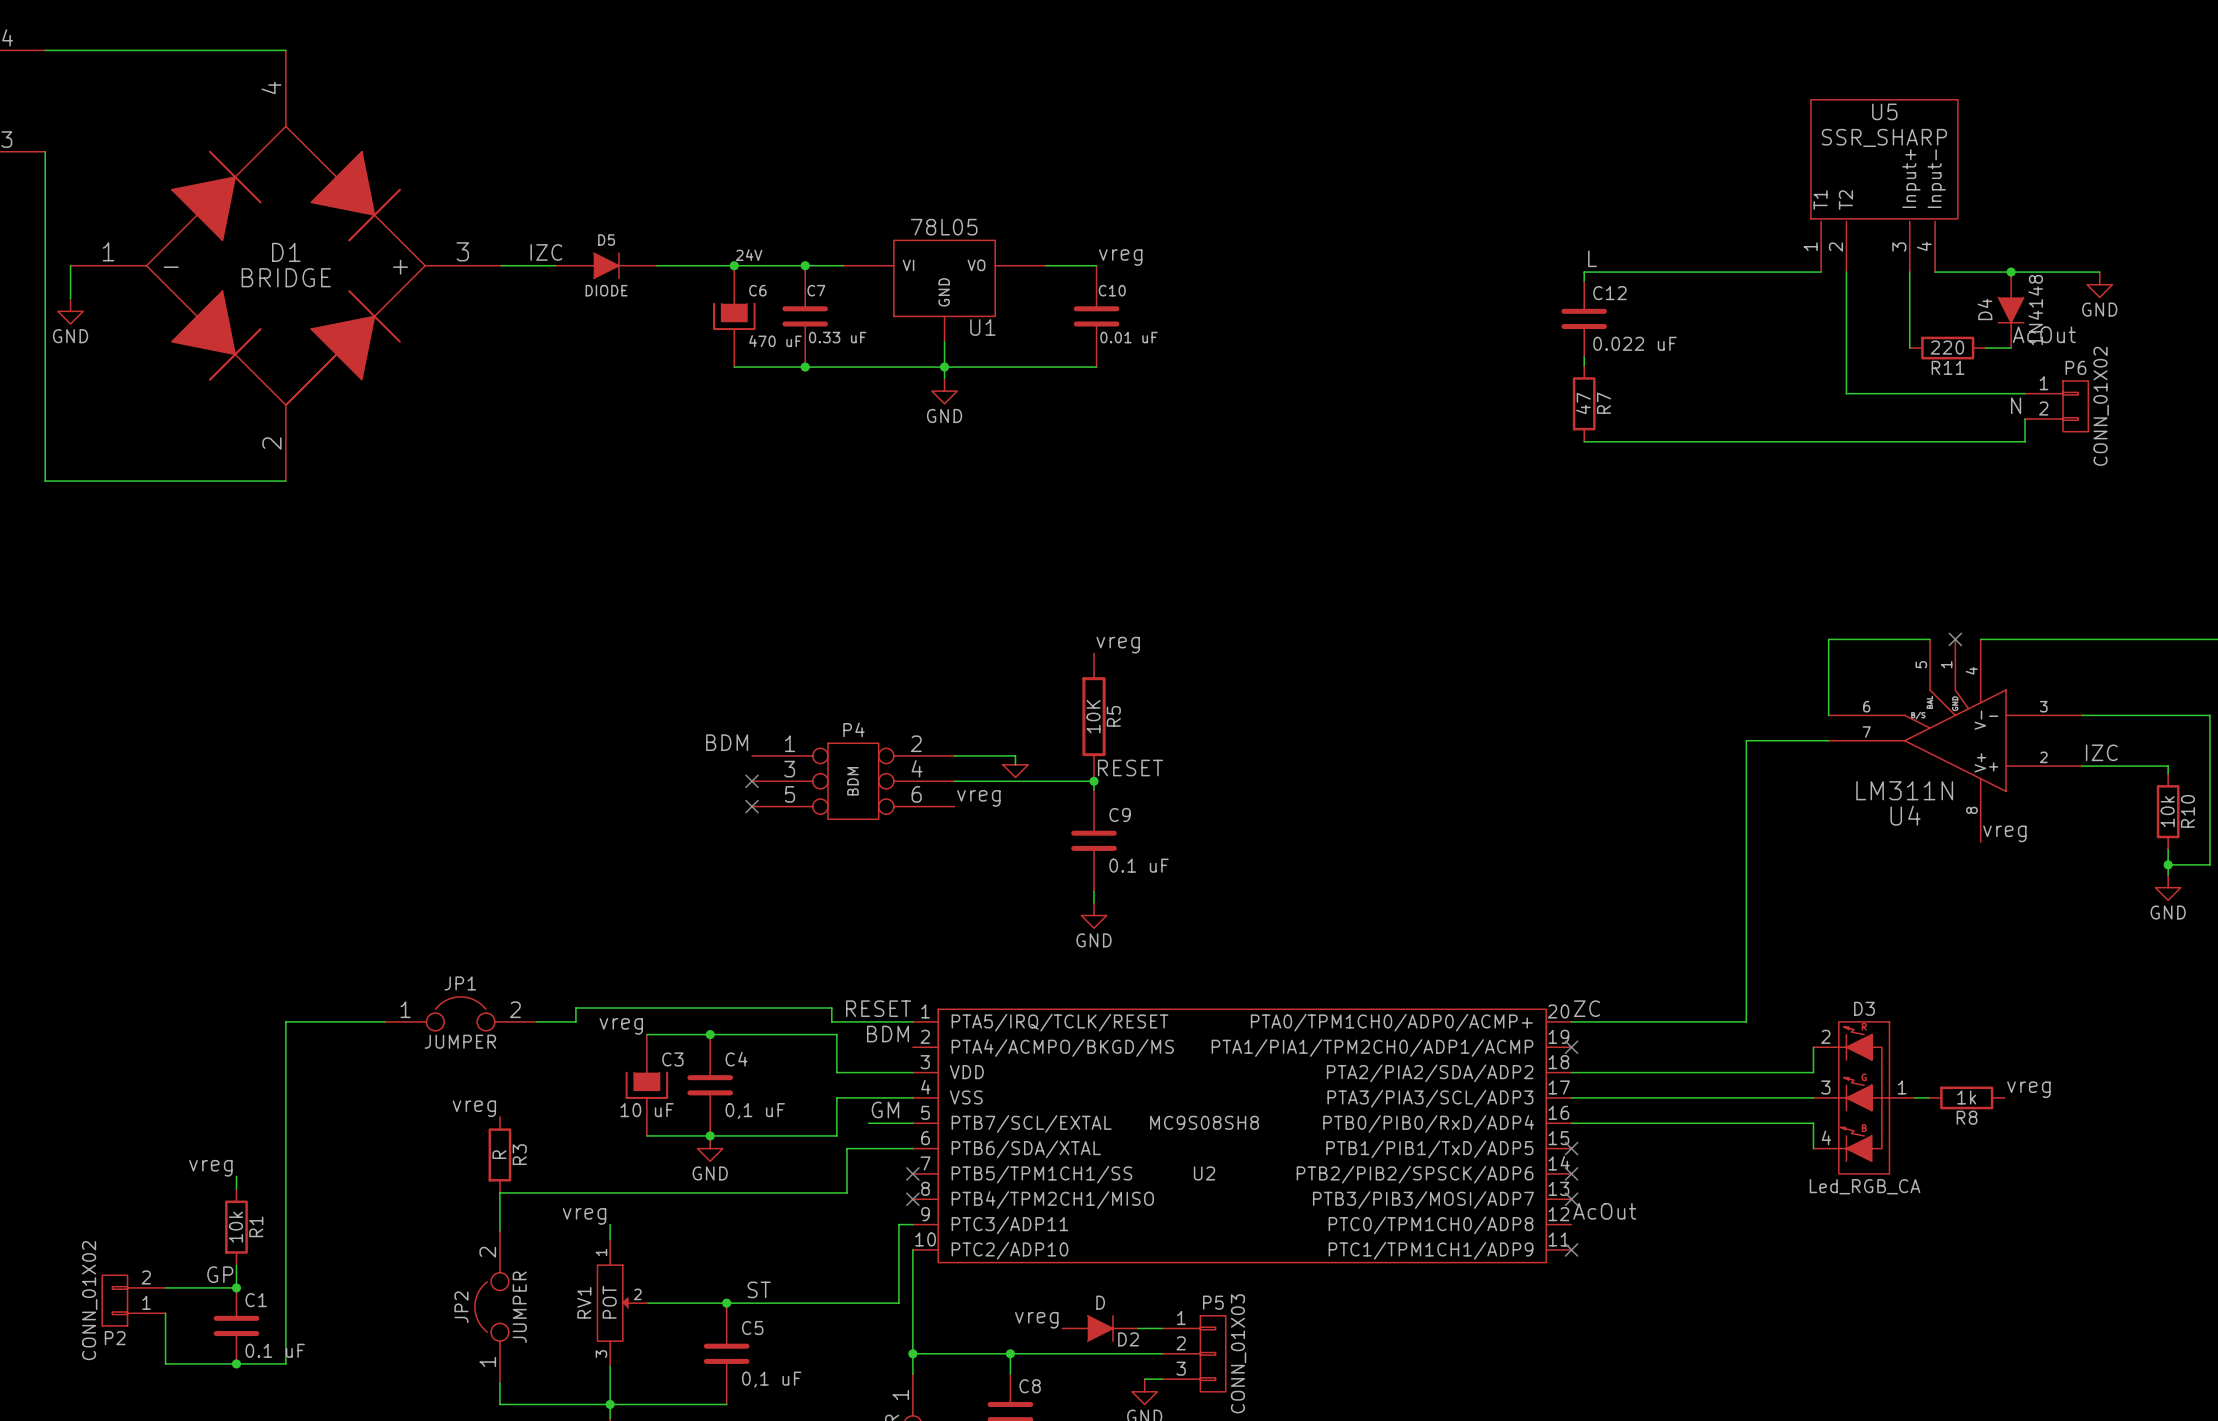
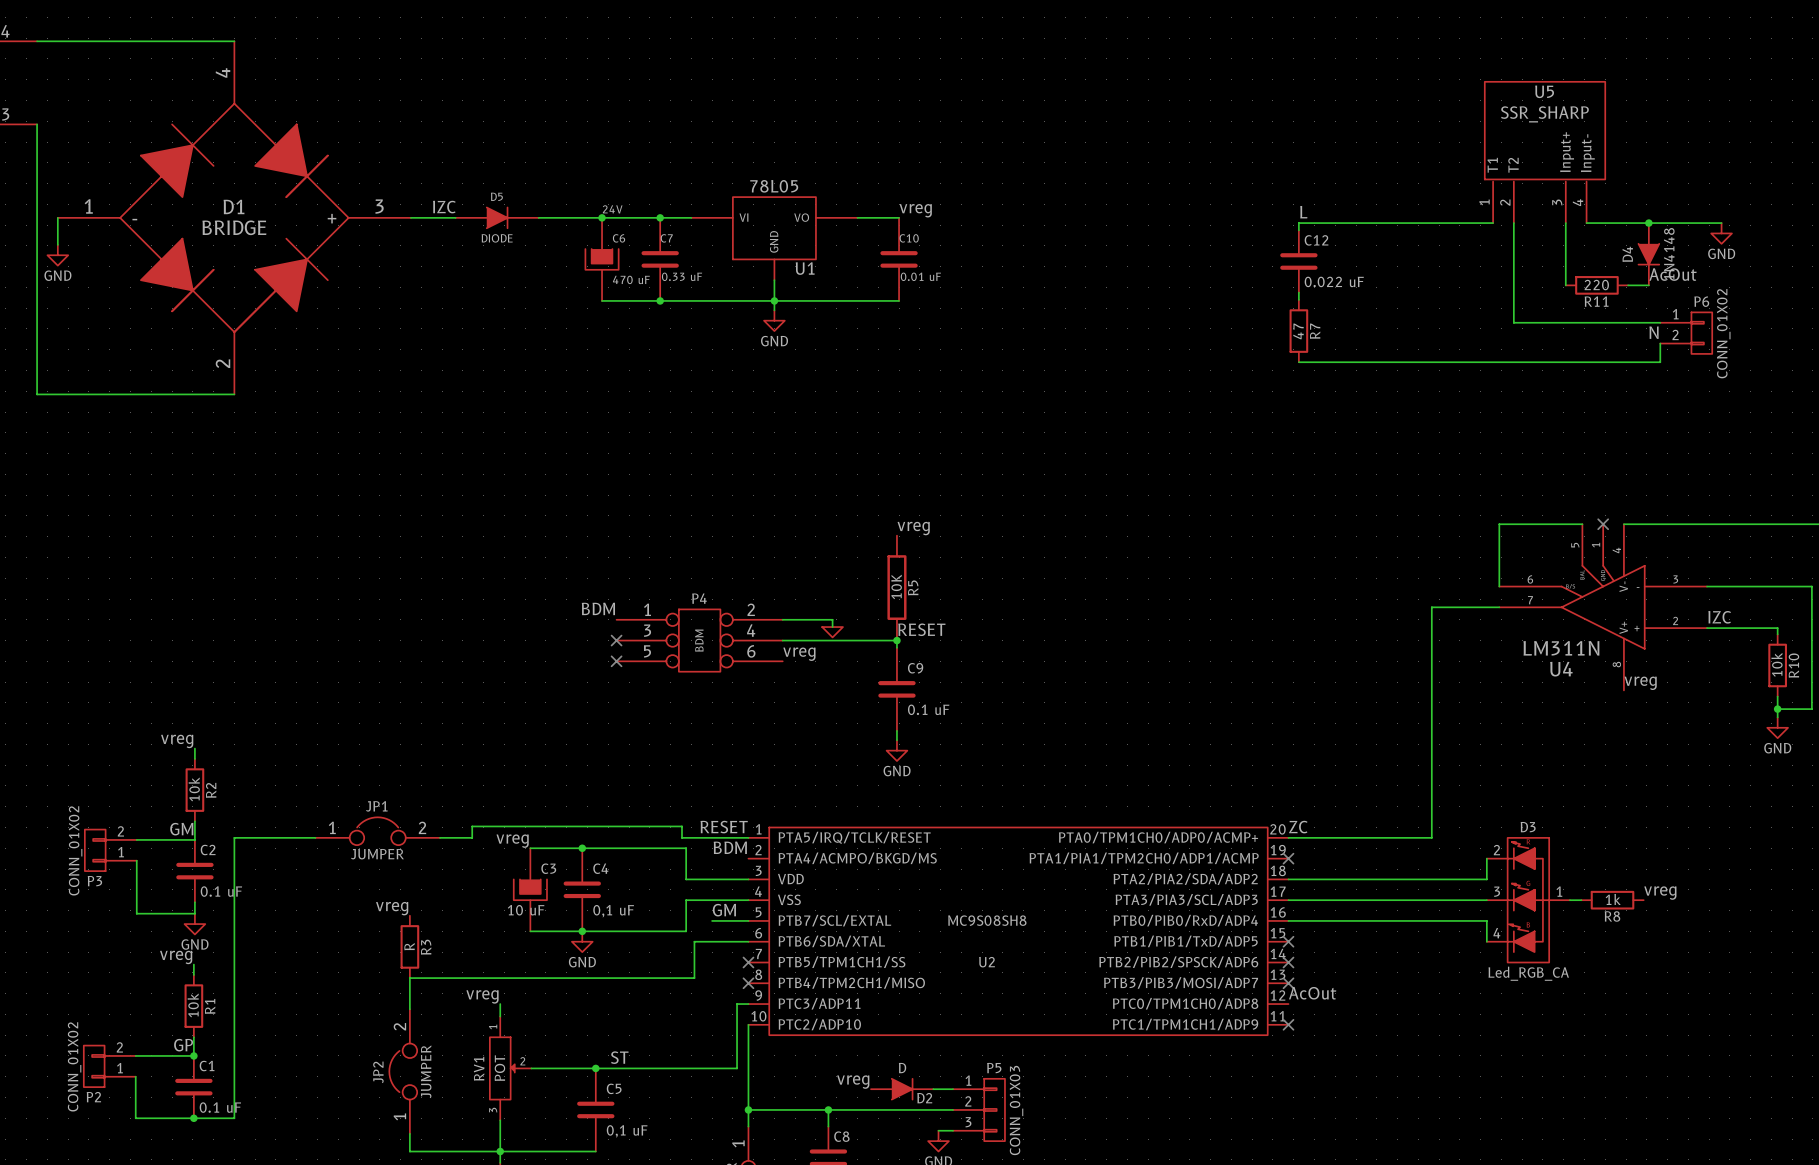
label: none -> vreg (177, 741)
wire: none -> (194, 748) (194, 758)
R2: none -> 10k (194, 790)
wire: none -> (194, 821) (194, 839) (136, 839)
label: none -> GM (181, 829)
P3: none -> CONN_01X02 (110, 850)
wire: none -> (136, 860) (136, 913) (194, 913) (194, 902)
C2: none -> 0.1 uF (194, 871)
power symbol: none -> GND (194, 924)

